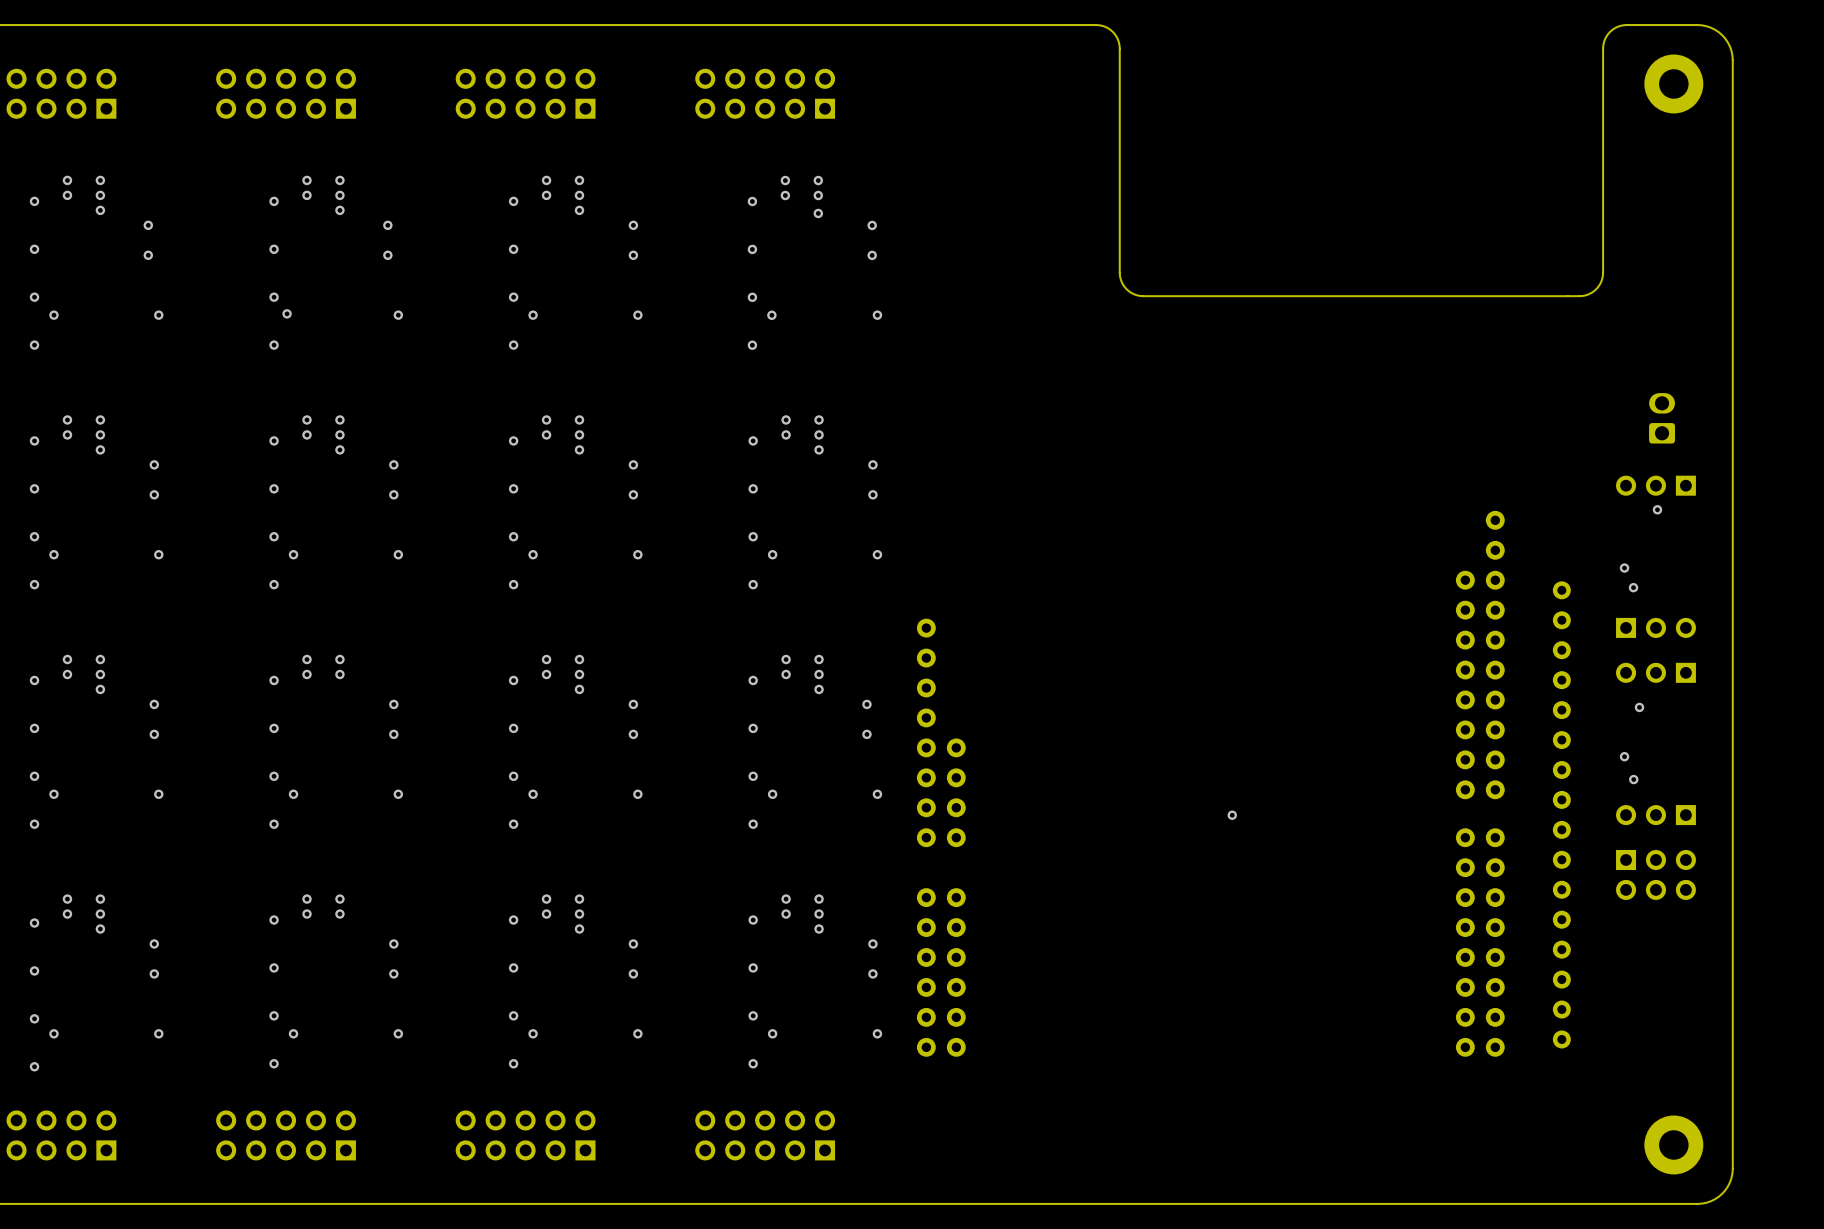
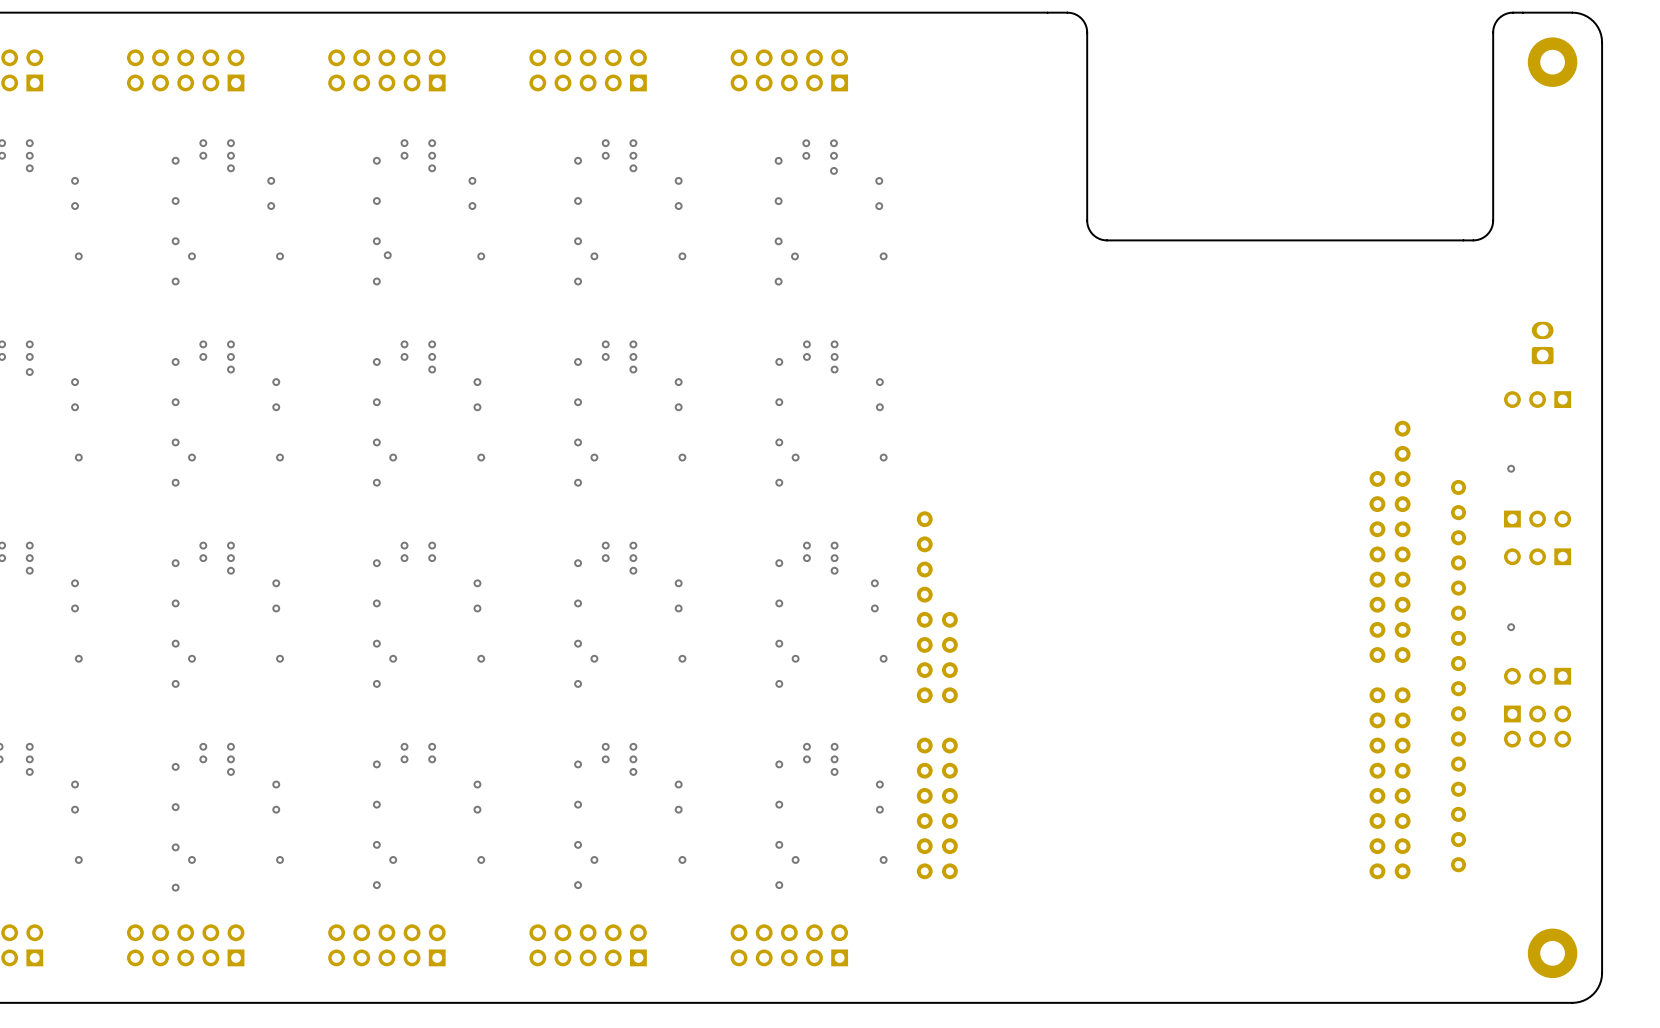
via: (1657, 509) -> none
via: (1633, 587) -> none
via: (1639, 707) -> none
via: (1633, 779) -> none
via: (1232, 815) -> none

